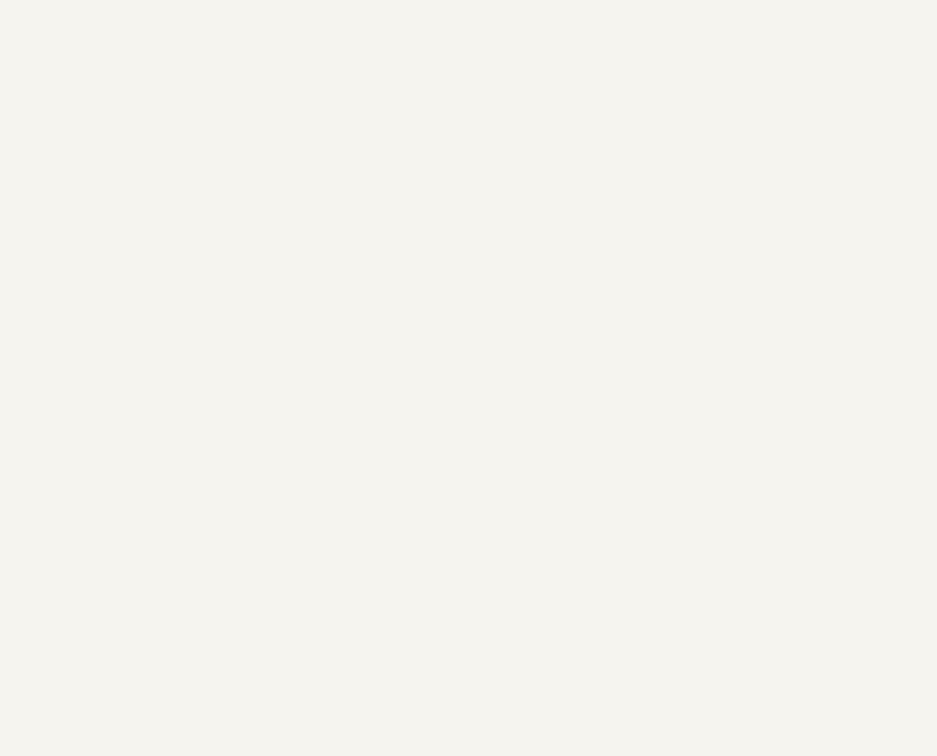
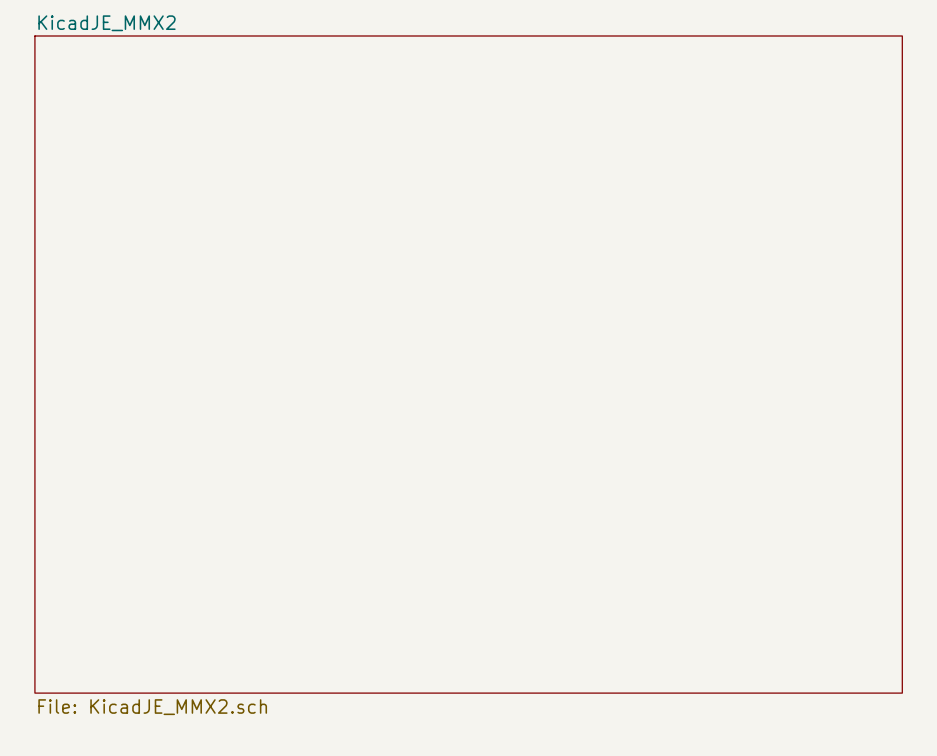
sheet KicadJE_MMX2: none -> File: KicadJE_MMX2.sch (468, 364)

